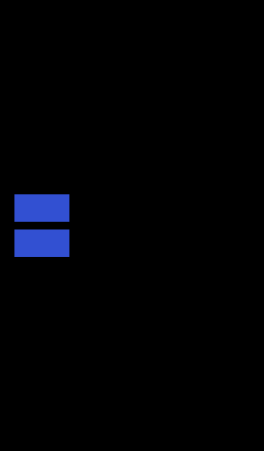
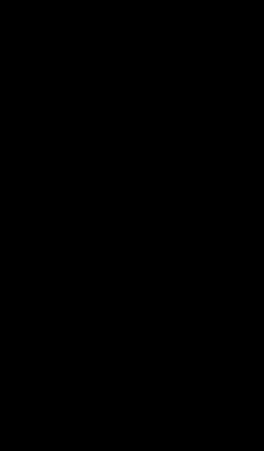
part: (41, 225) -> none

